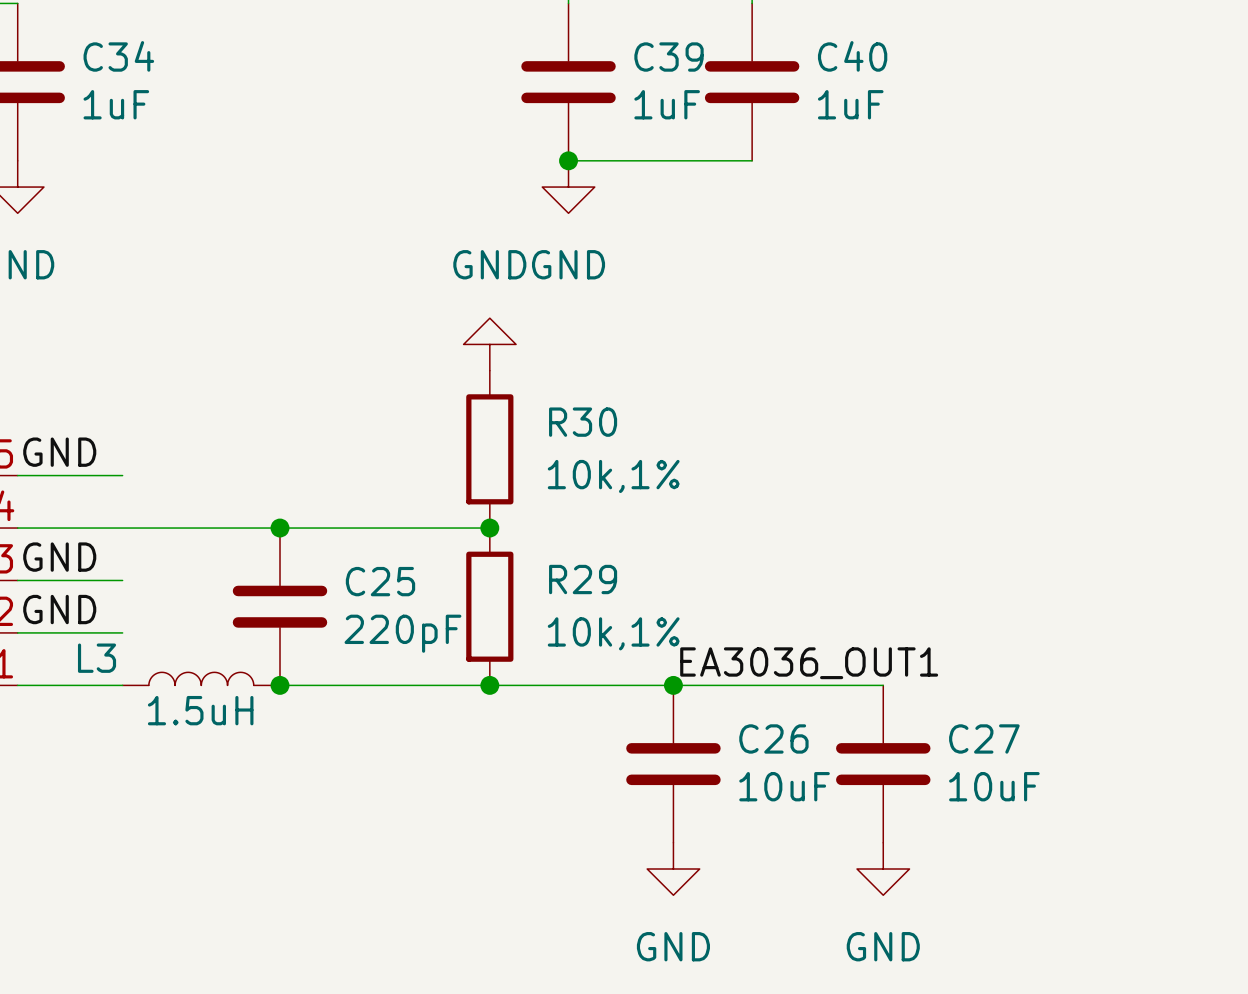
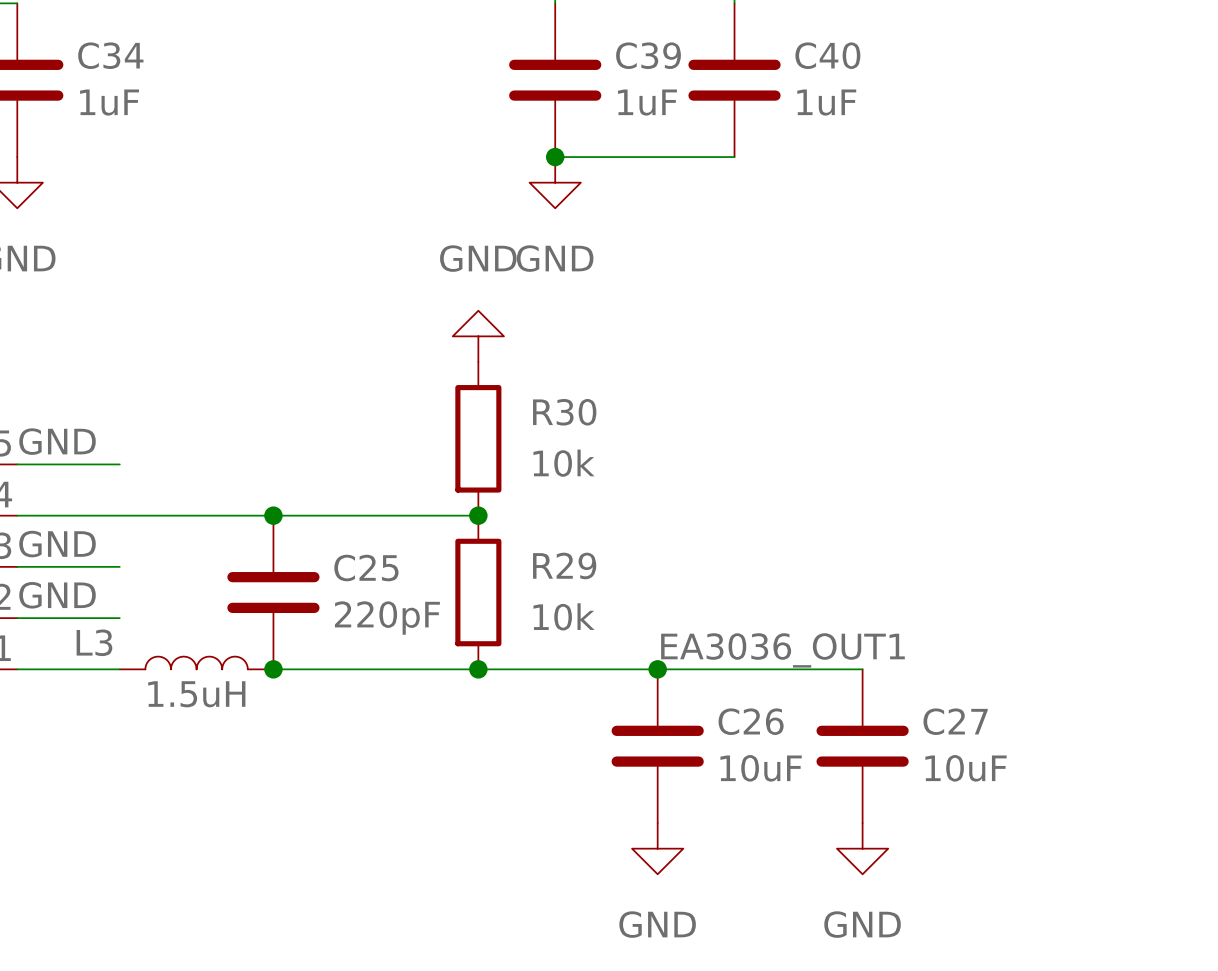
R30 value: 10k,1% (613, 476) -> 10k (564, 463)
R29 value: 10k,1% (613, 633) -> 10k (564, 616)

